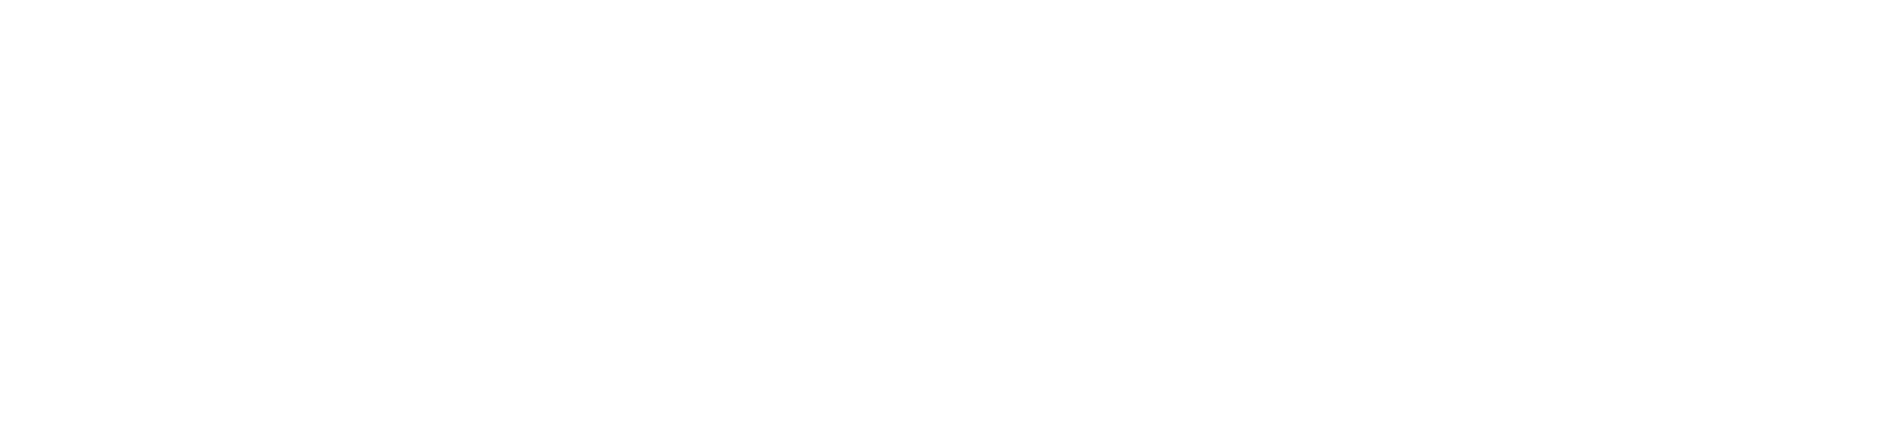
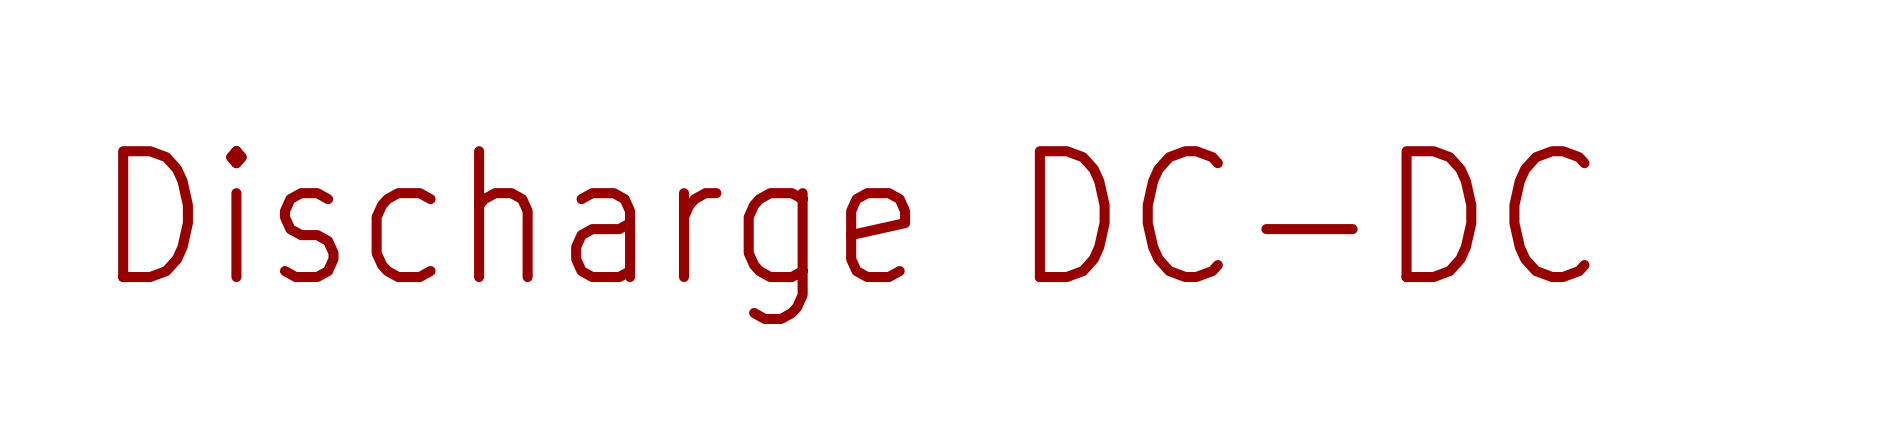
text: none -> Discharge DC-DC (853, 235)

